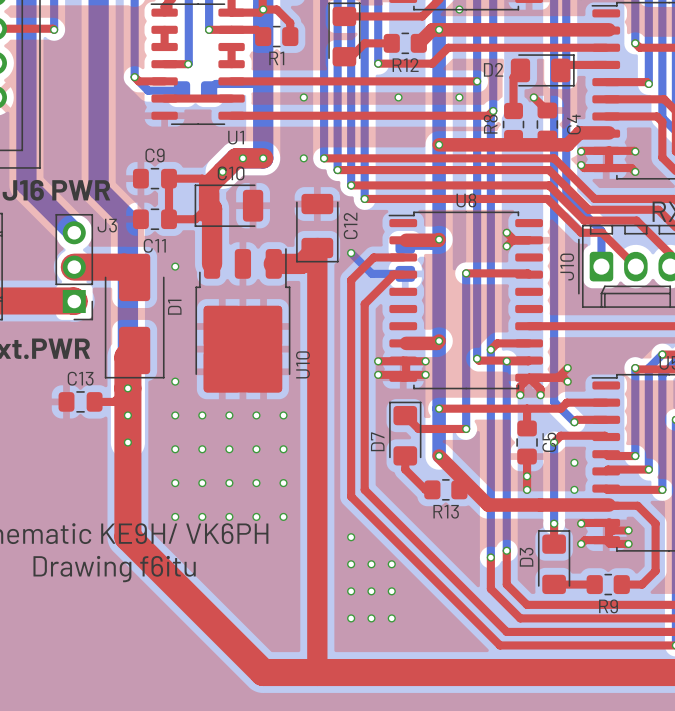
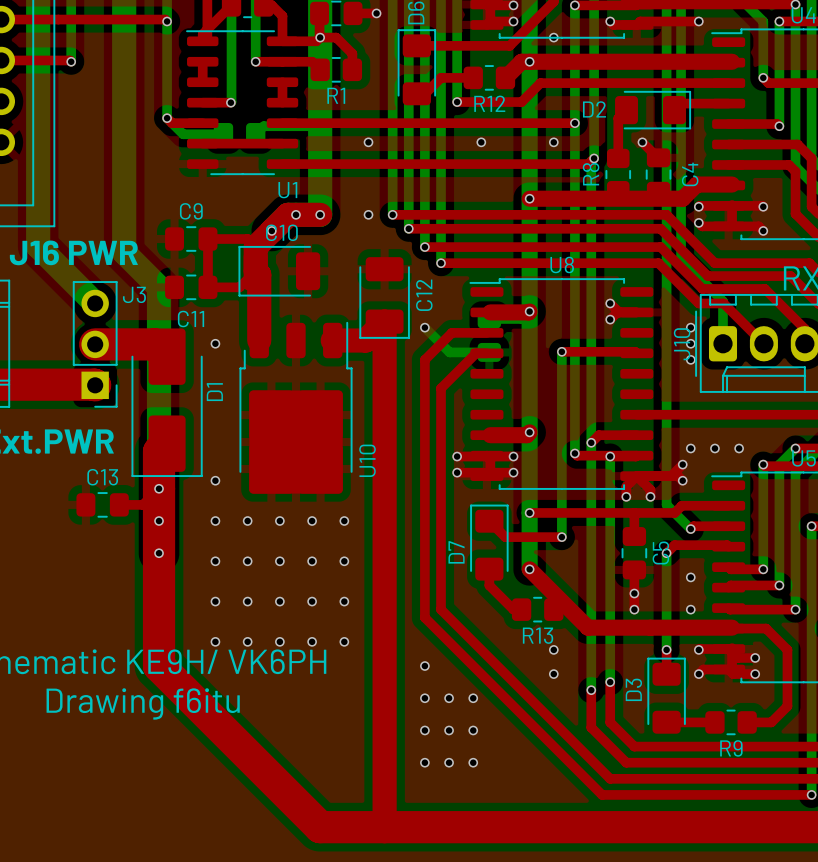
via: none -> (690, 327)
via: none -> (690, 343)
via: none -> (690, 359)
via: none -> (690, 448)
via: none -> (714, 448)
via: none -> (739, 448)
via: none -> (553, 649)
via: none -> (553, 674)

